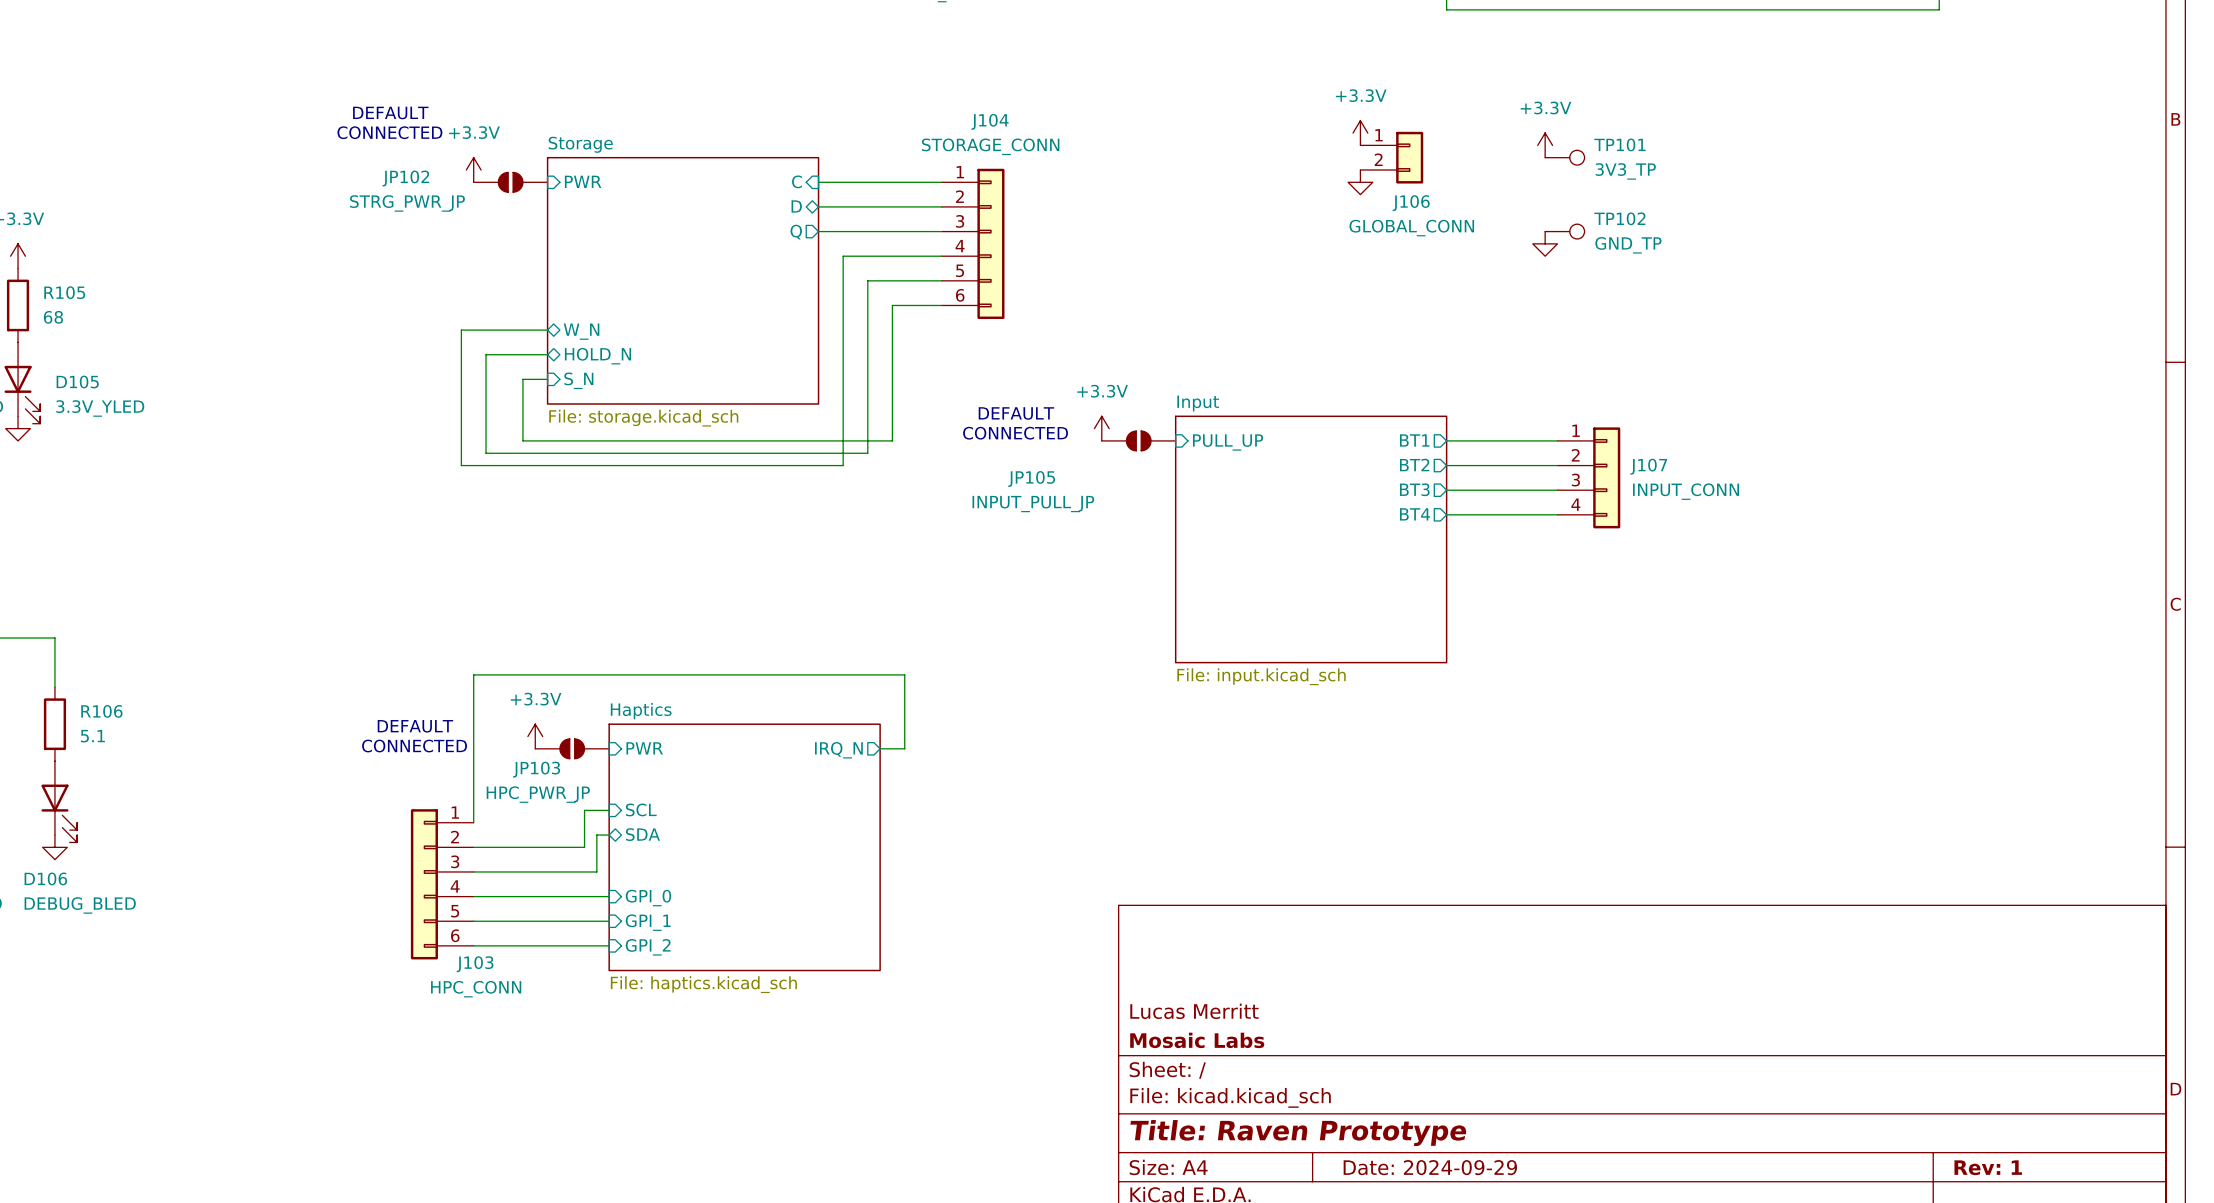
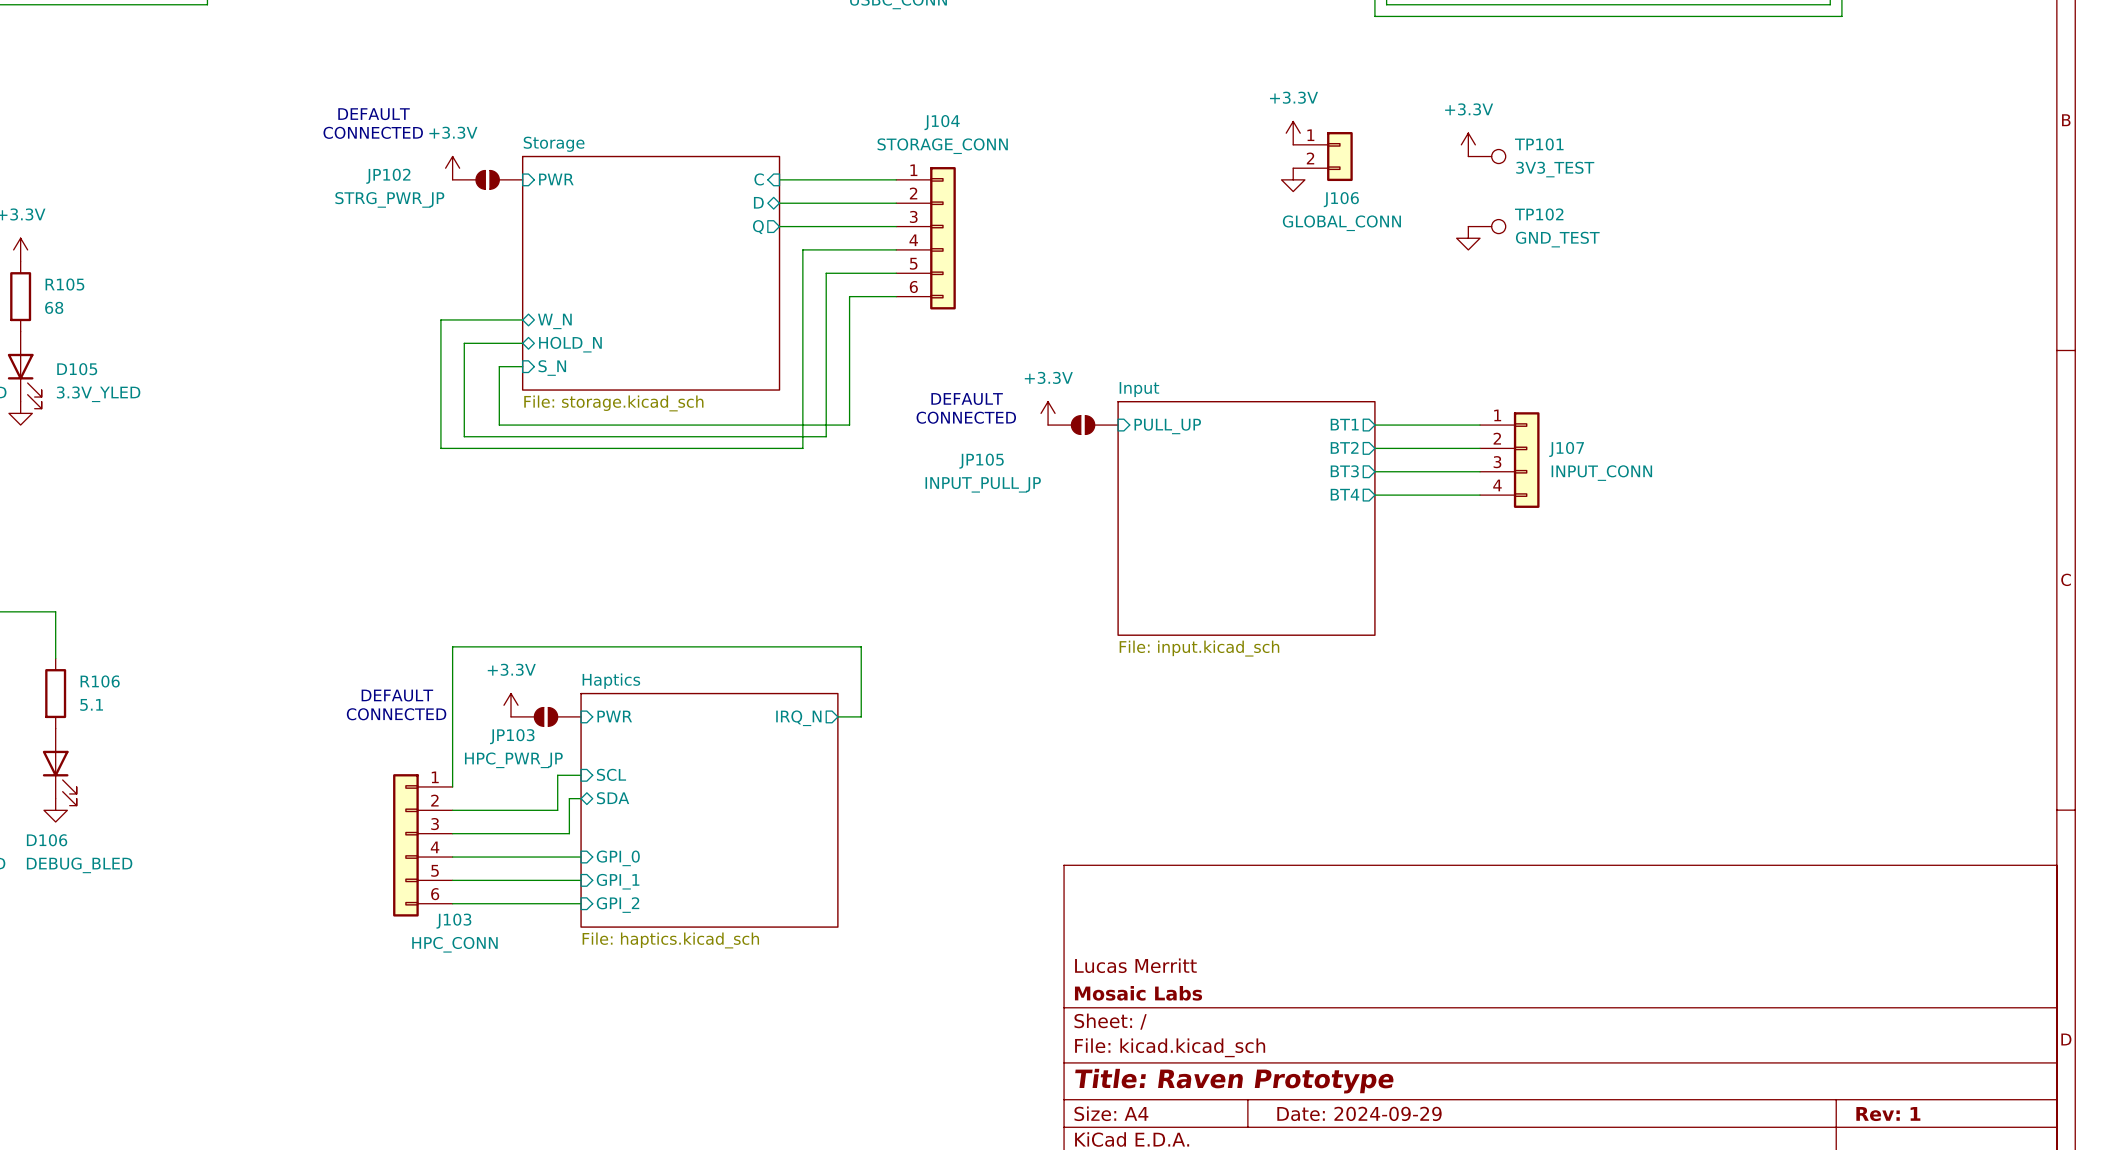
TP101 value: 3V3_TP (1625, 171) -> 3V3_TEST (1555, 169)
TP102 value: GND_TP (1628, 245) -> GND_TEST (1557, 239)

